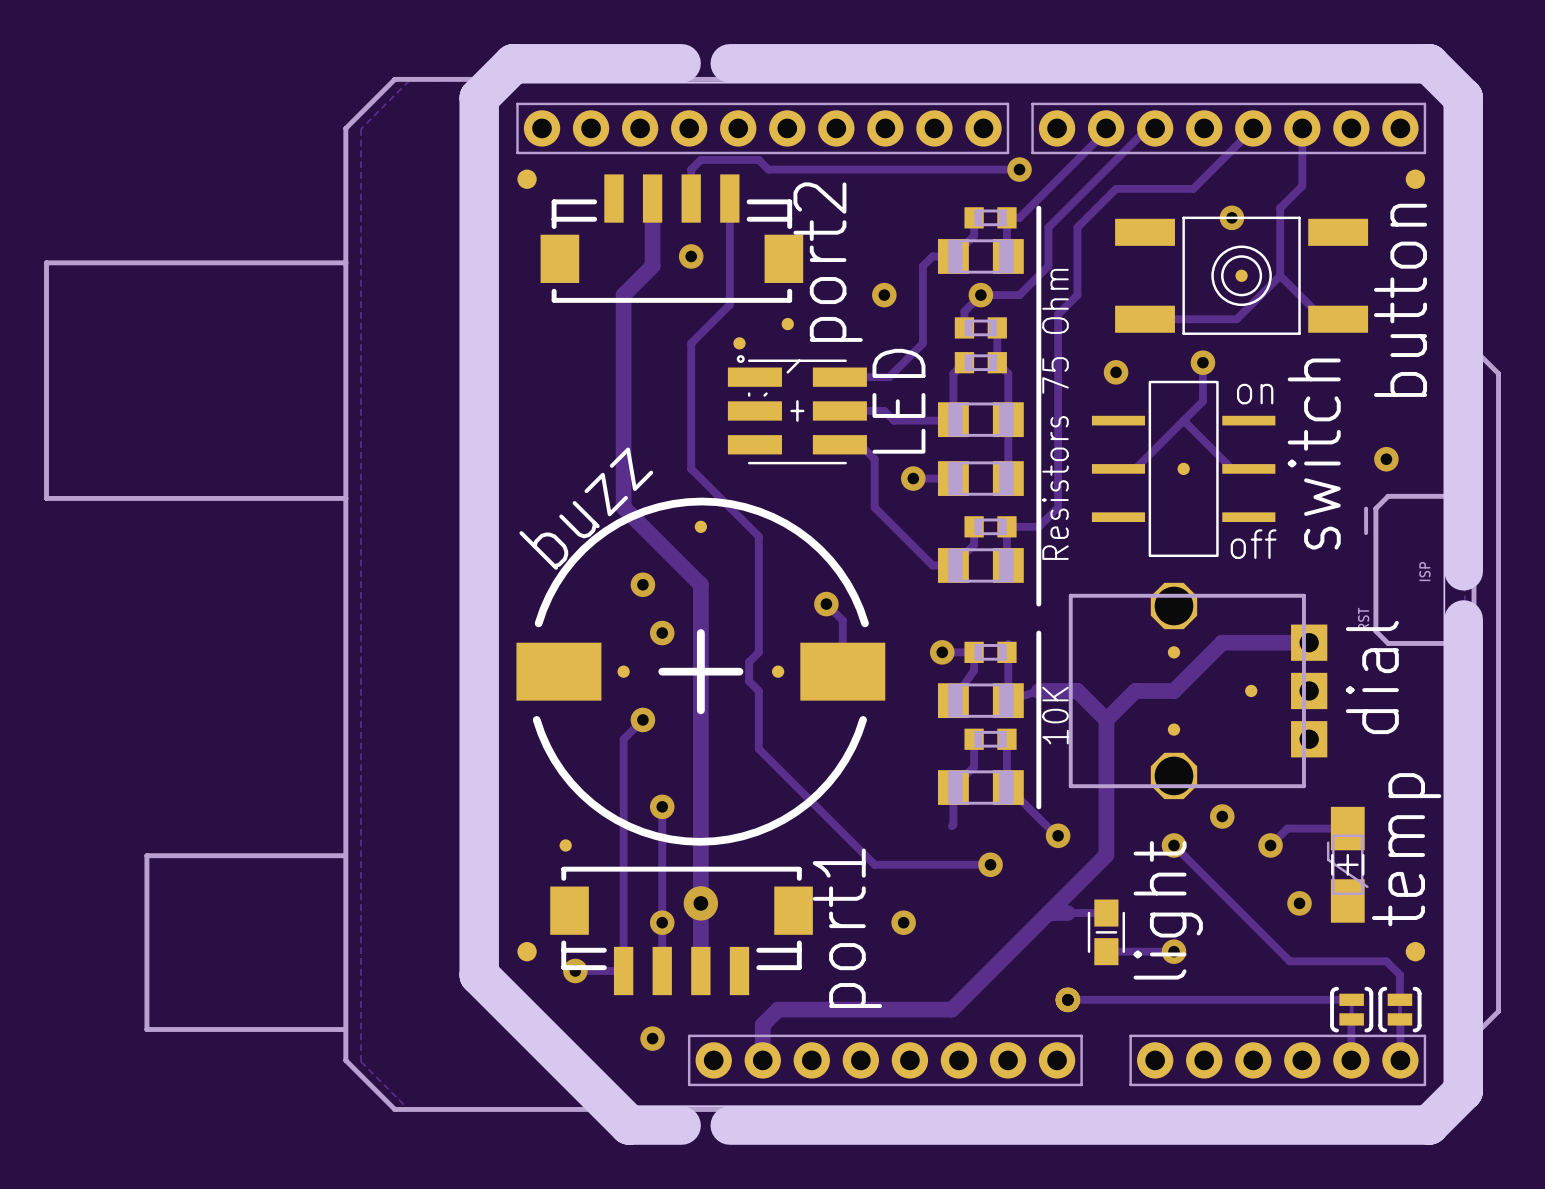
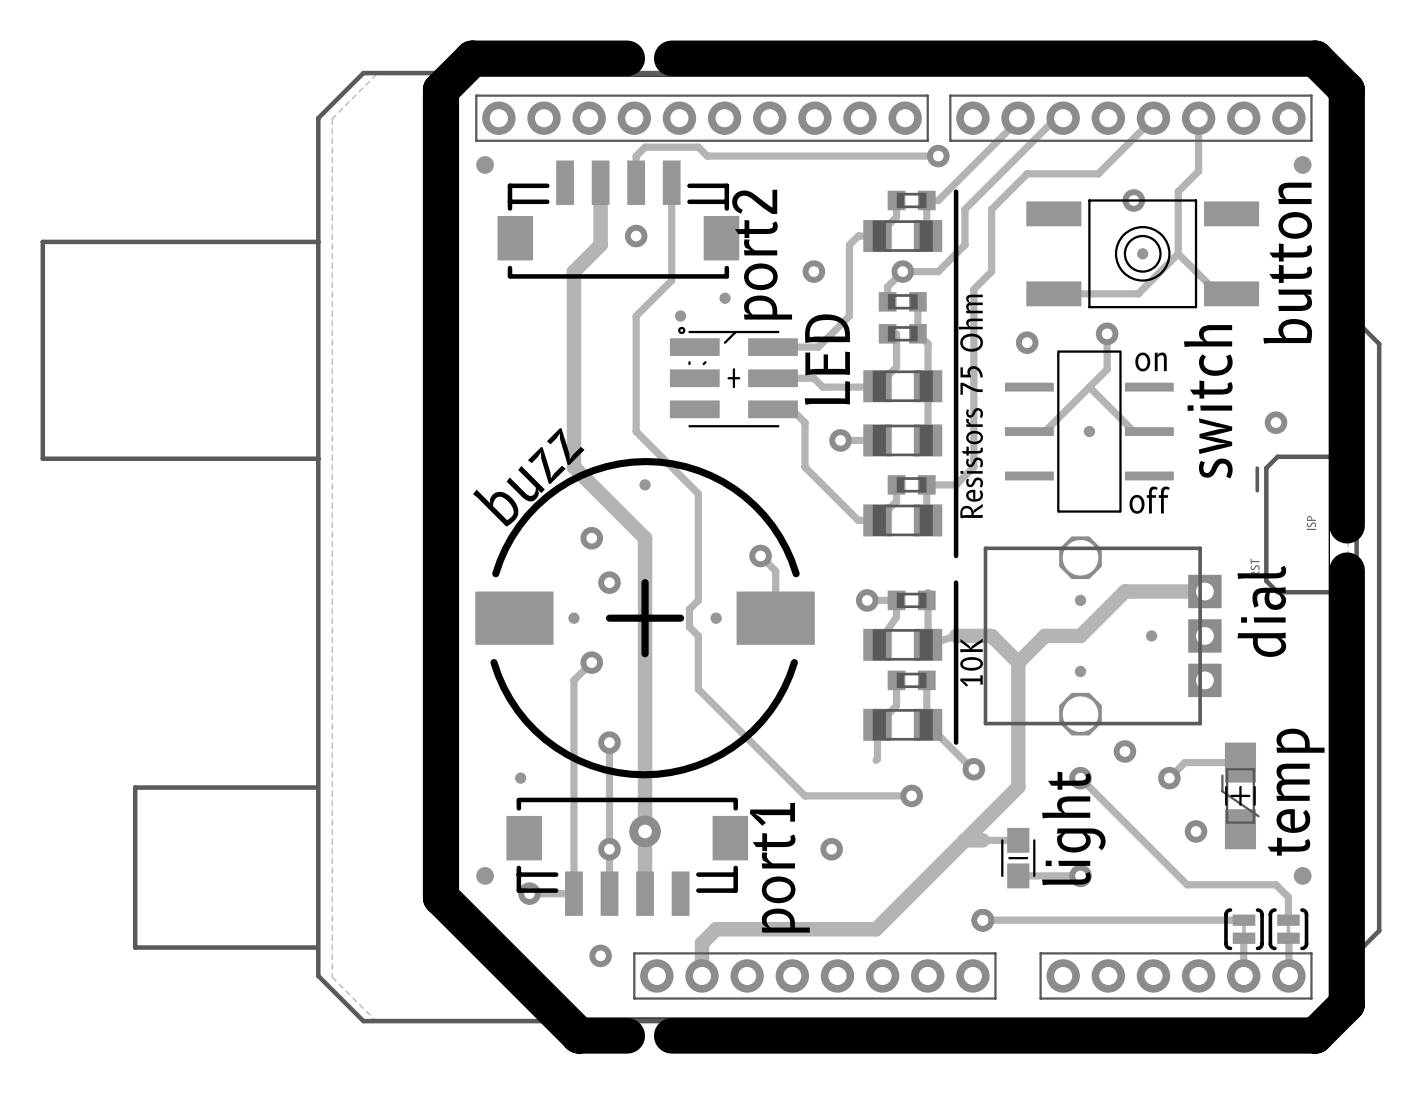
track: (964, 362) (953, 373) (953, 419) -> (896, 333) (896, 367) (877, 386)

